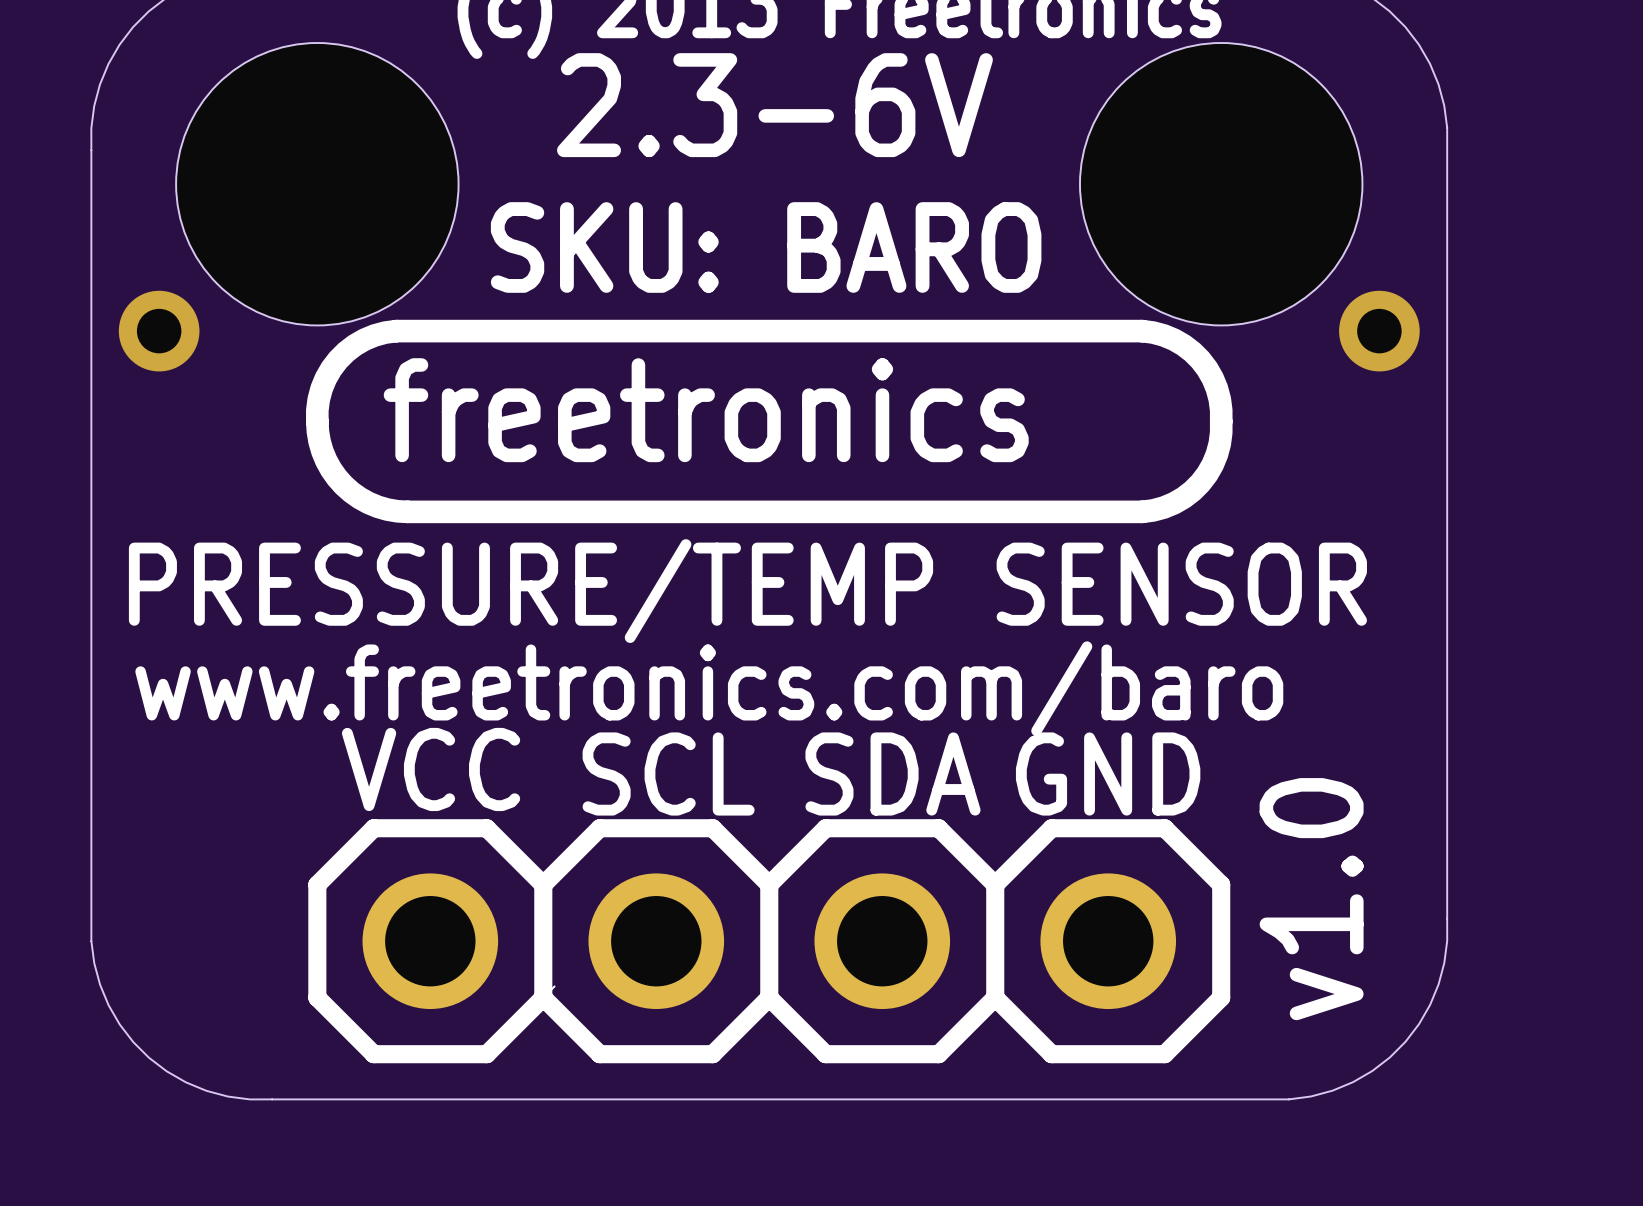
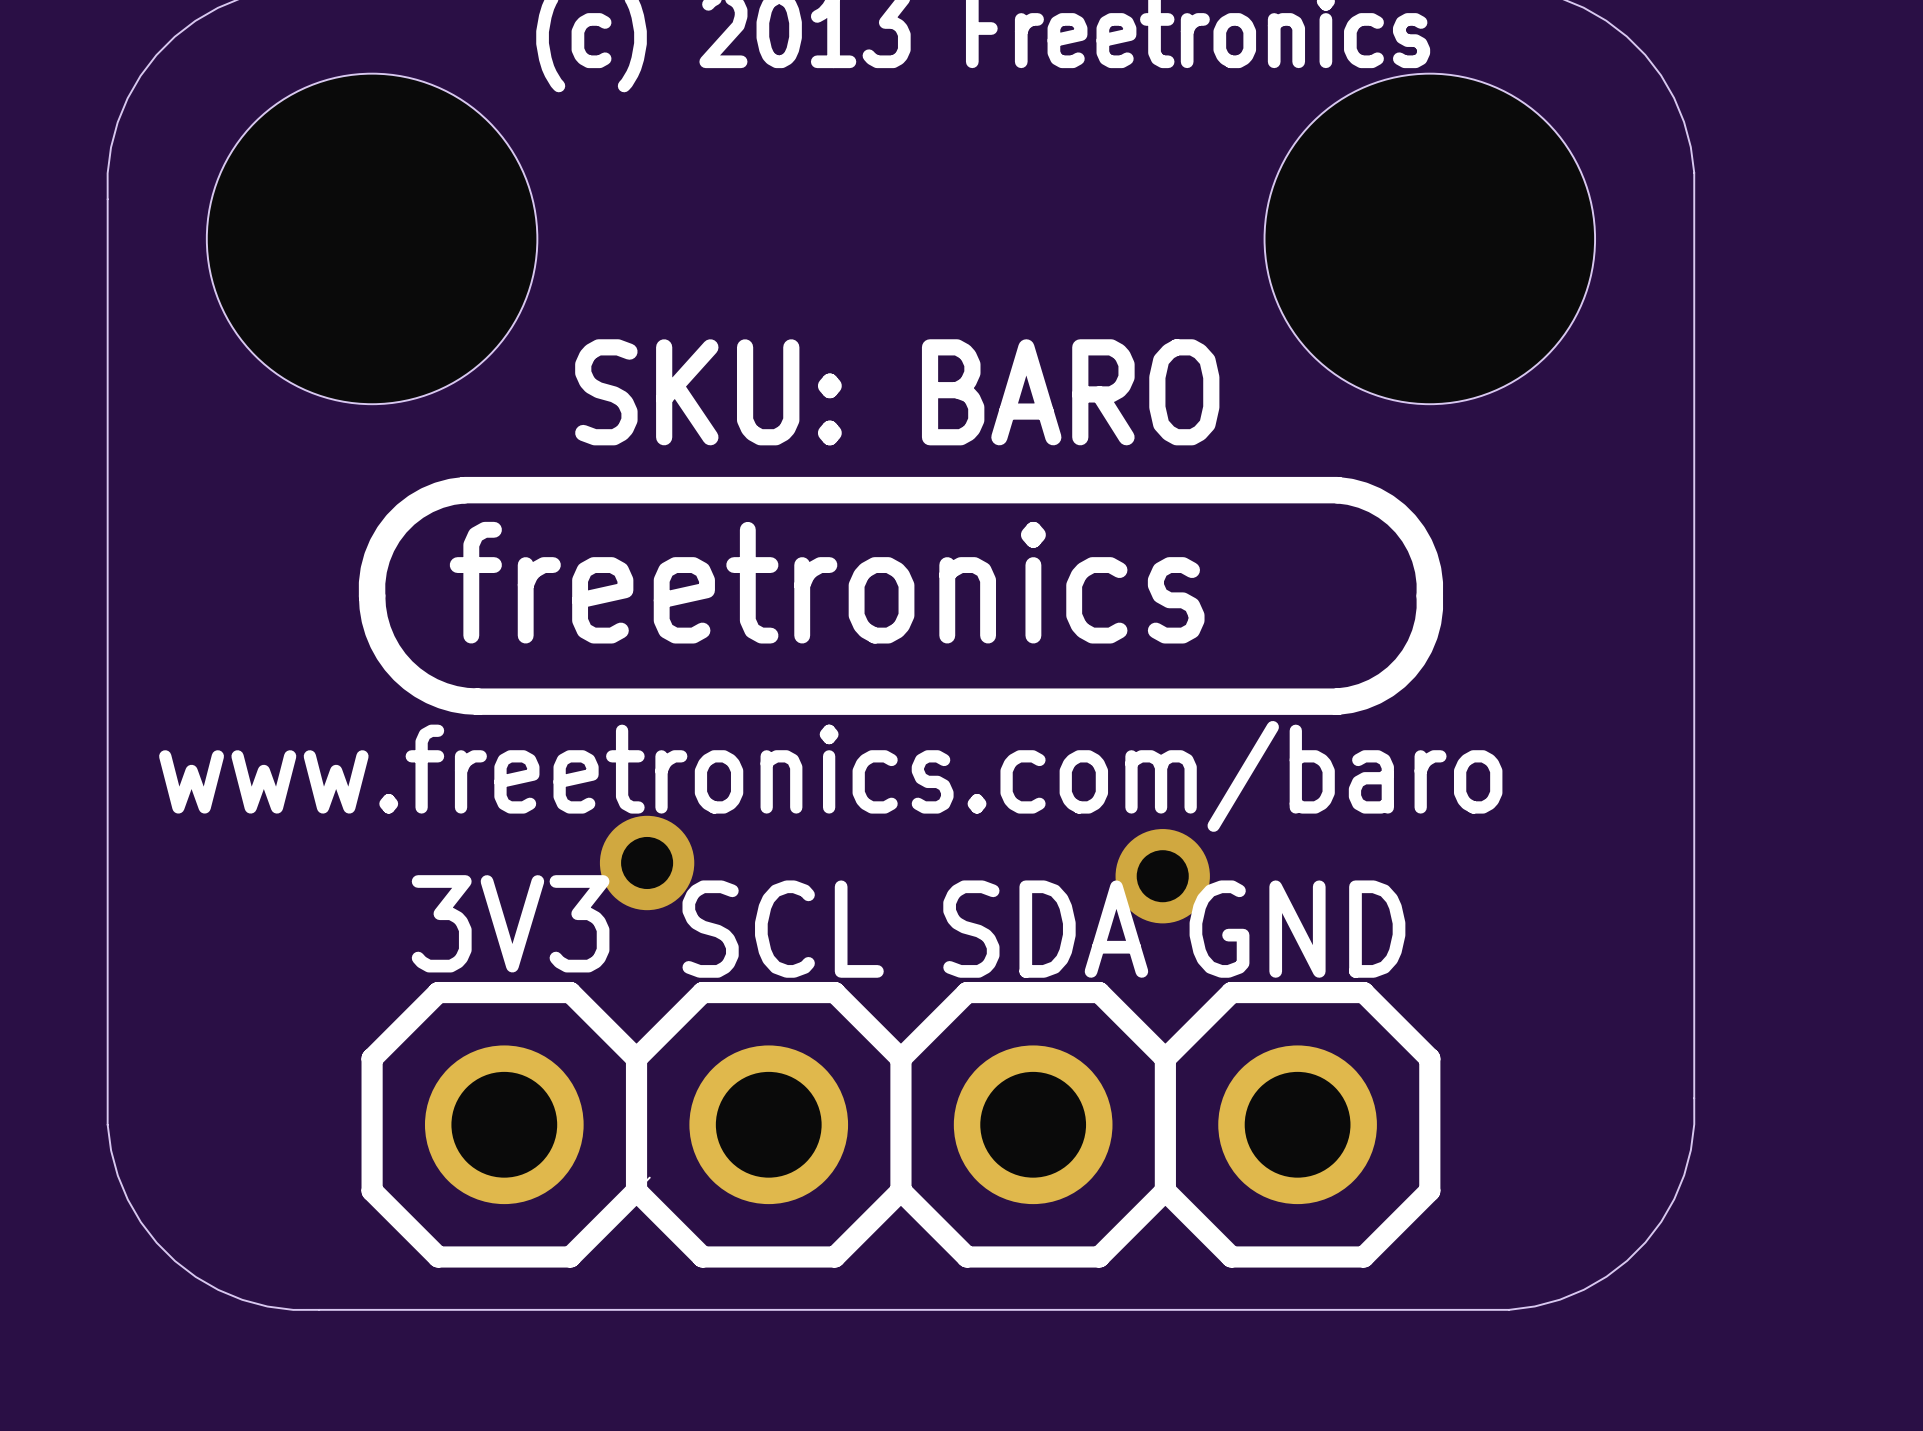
text: 2.3-6V (774, 105) -> none
text position: SKU: BARO (766, 247) -> SKU: BARO (897, 392)
via: (159, 331) -> none
line: (1142, 331) (396, 331) (364, 339) (338, 359) (321, 388) (317, 410) (317, 431) (326, 460) (343, 485) (368, 502) (397, 511) (1142, 511) (1174, 503) (1192, 490) (1212, 464) (1221, 432) (1221, 410) (1216, 388) (1200, 359) (1174, 339) (1142, 331) -> (1337, 490) (464, 490) (451, 491) (427, 500) (405, 514) (396, 523) (388, 534) (377, 557) (372, 582) (372, 607) (382, 641) (403, 670) (431, 691) (466, 701) (1337, 701) (1350, 699) (1374, 691) (1396, 677) (1413, 657) (1419, 646) (1428, 621) (1429, 608) (1429, 582) (1424, 557) (1413, 534) (1405, 523) (1396, 514) (1374, 500) (1350, 491) (1337, 490)
via: (1379, 331) -> none
text position: freetronics (706, 410) -> freetronics (827, 582)
text: PRESSURE/TEMP SENSOR (747, 591) -> none
text position: www.freetronics.com/baro (709, 688) -> www.freetronics.com/baro (830, 776)
via: none -> (647, 862)
via: none -> (1162, 876)
text: VCC (431, 769) -> 3V3 (510, 923)
text: v1.0 (1311, 899) -> none

